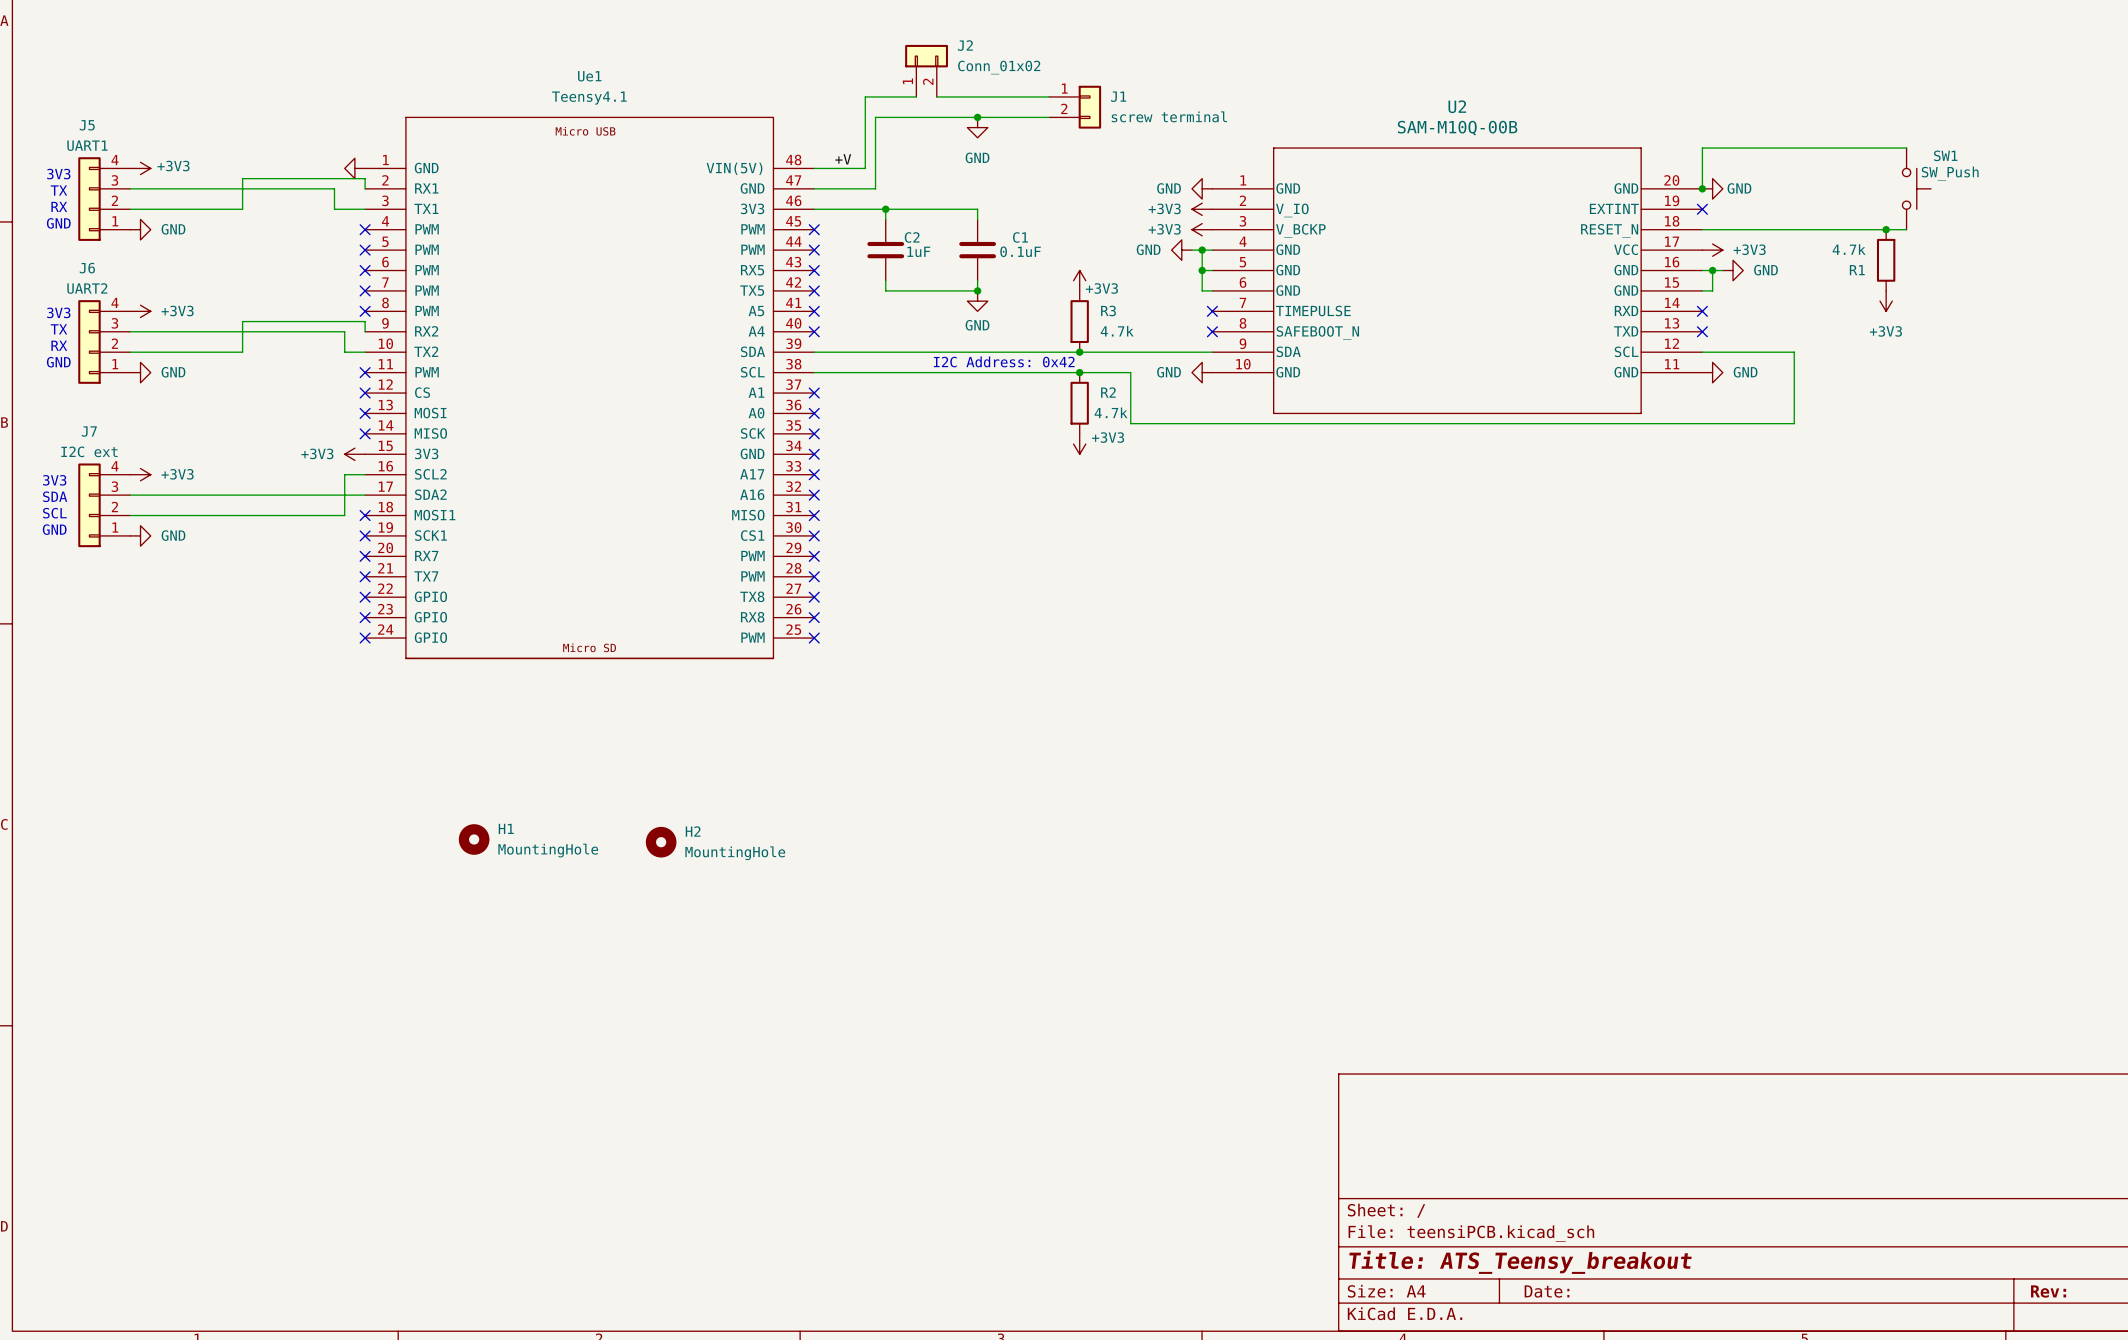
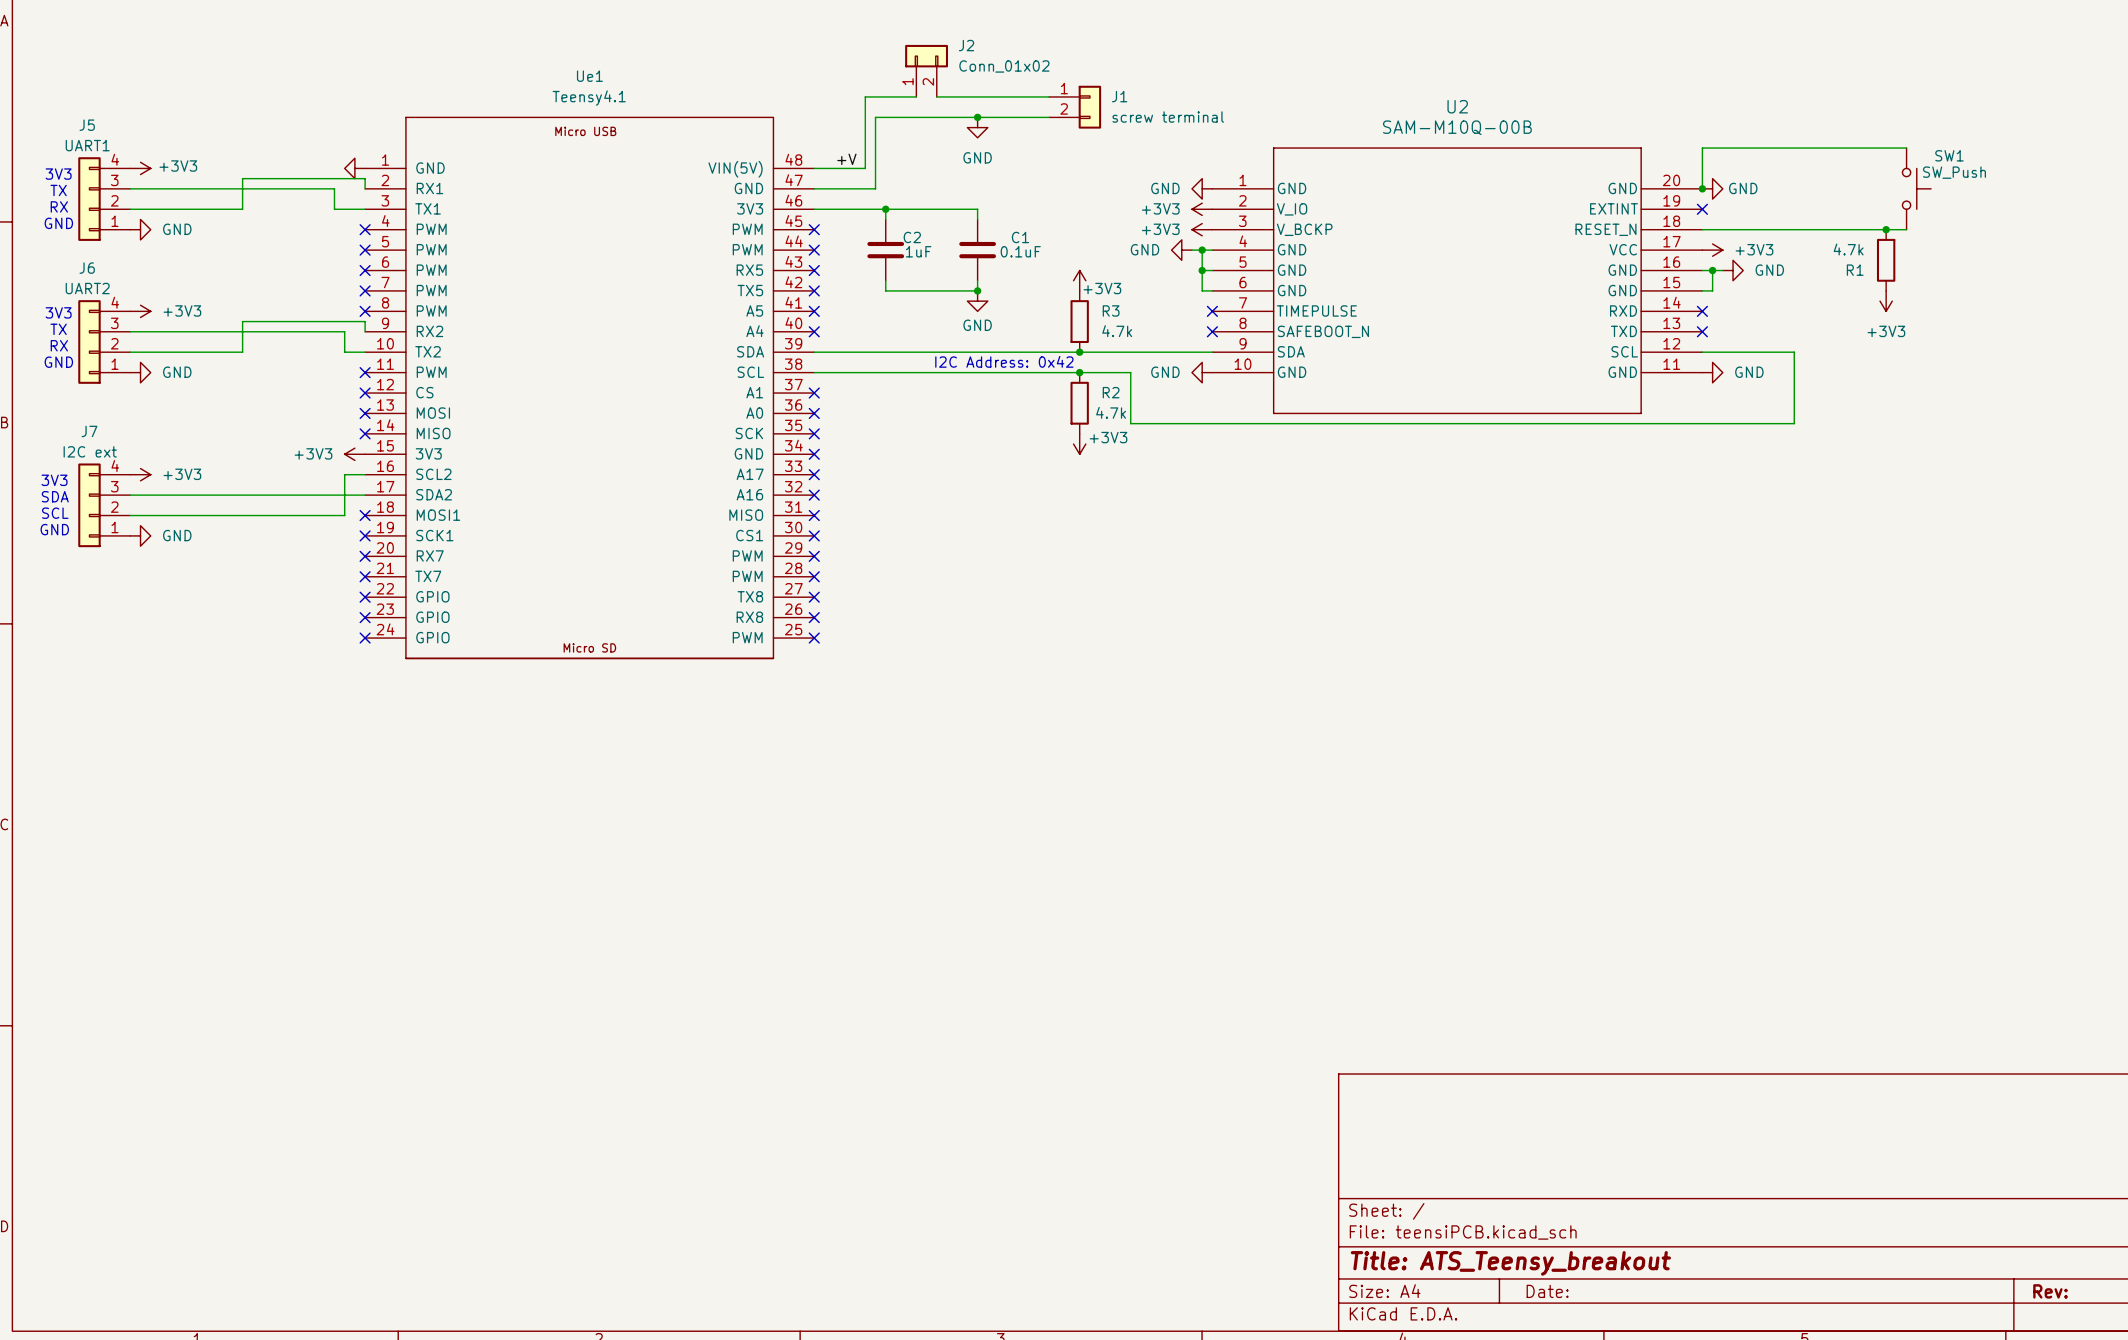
H1: MountingHole (474, 839) -> none
H2: MountingHole (661, 842) -> none

